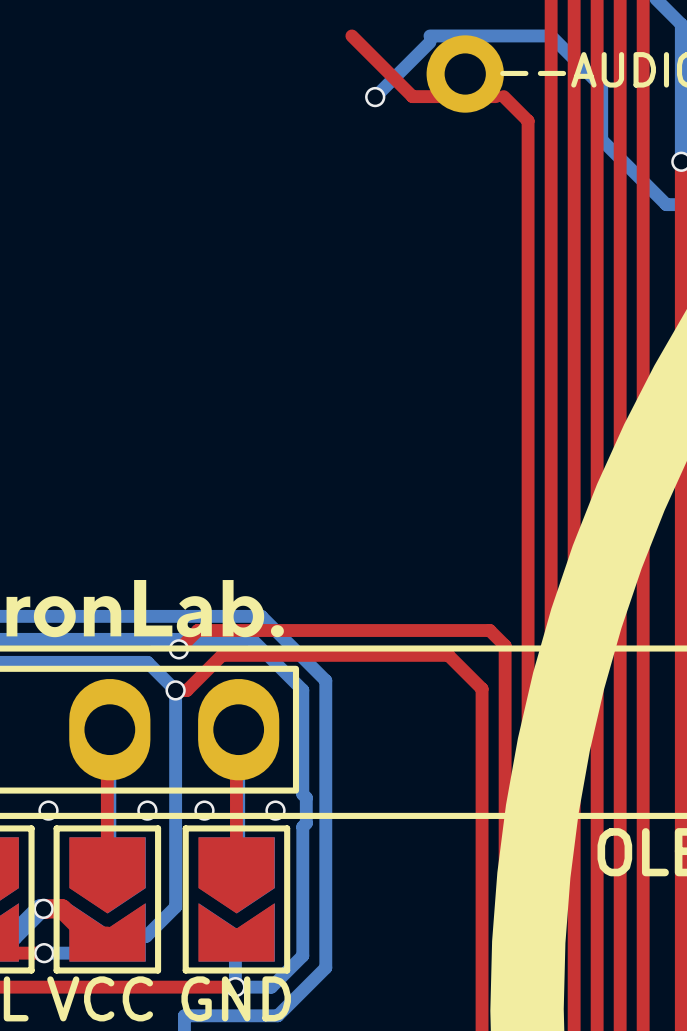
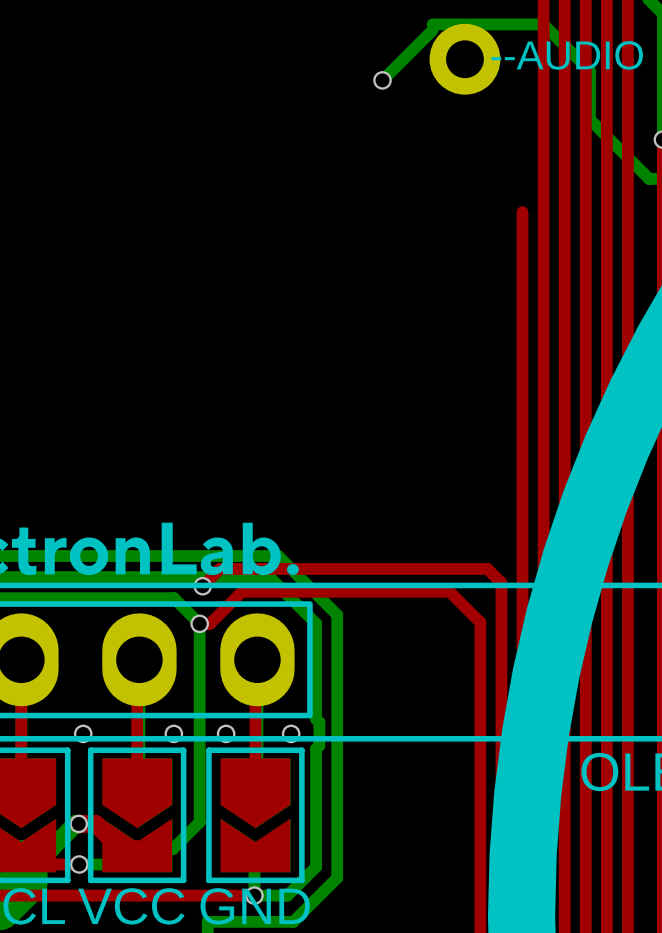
top track: (351, 35) (412, 96) (495, 96) -> none
top track: (503, 96) (528, 120) (528, 240) -> none

